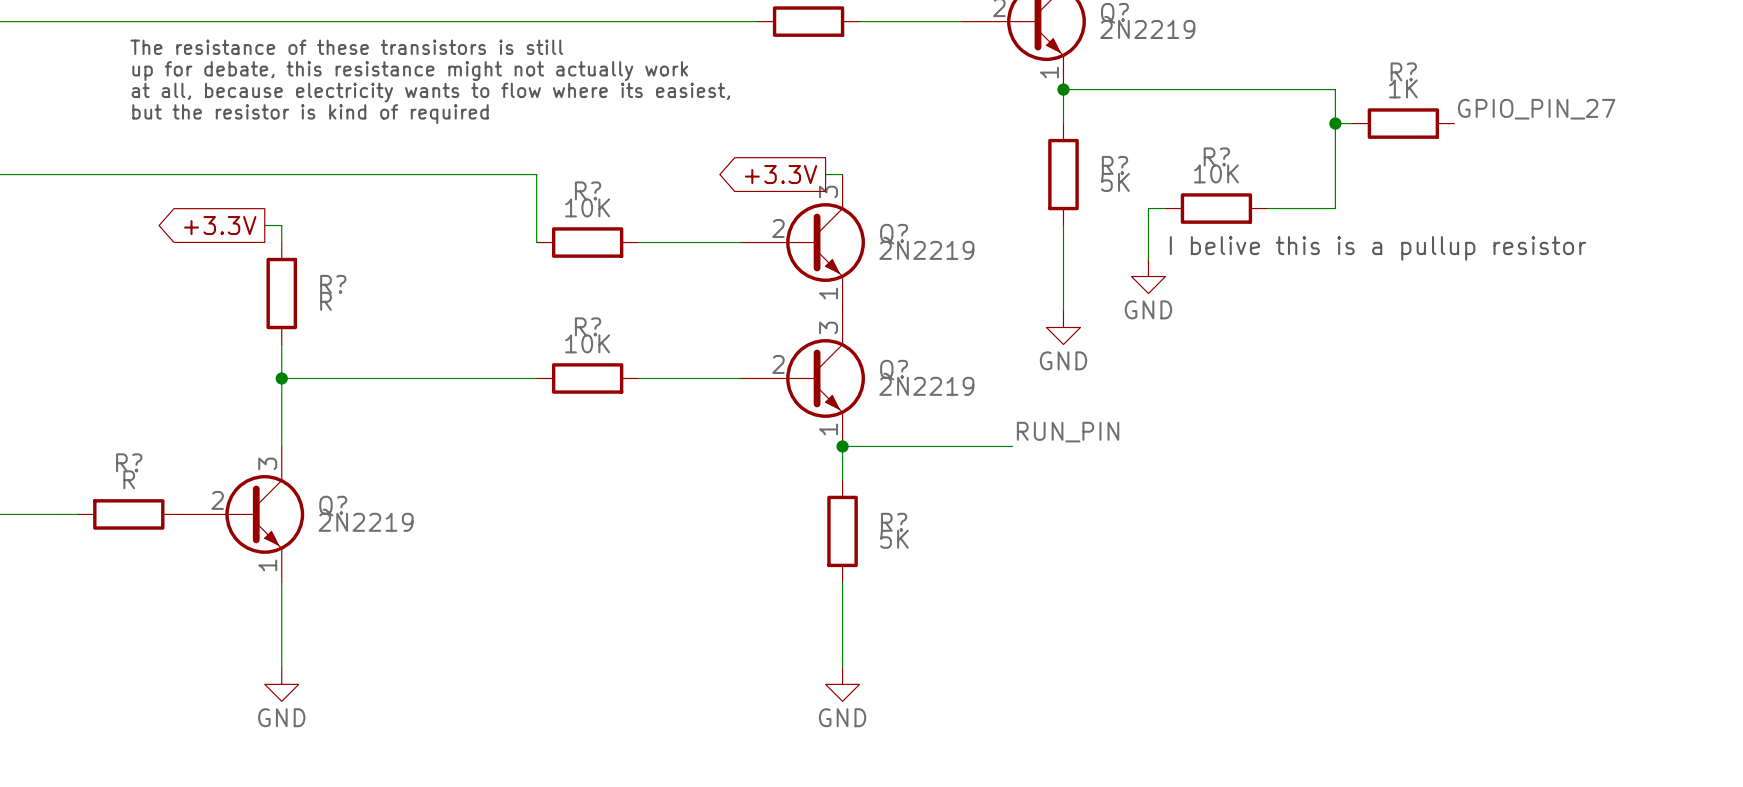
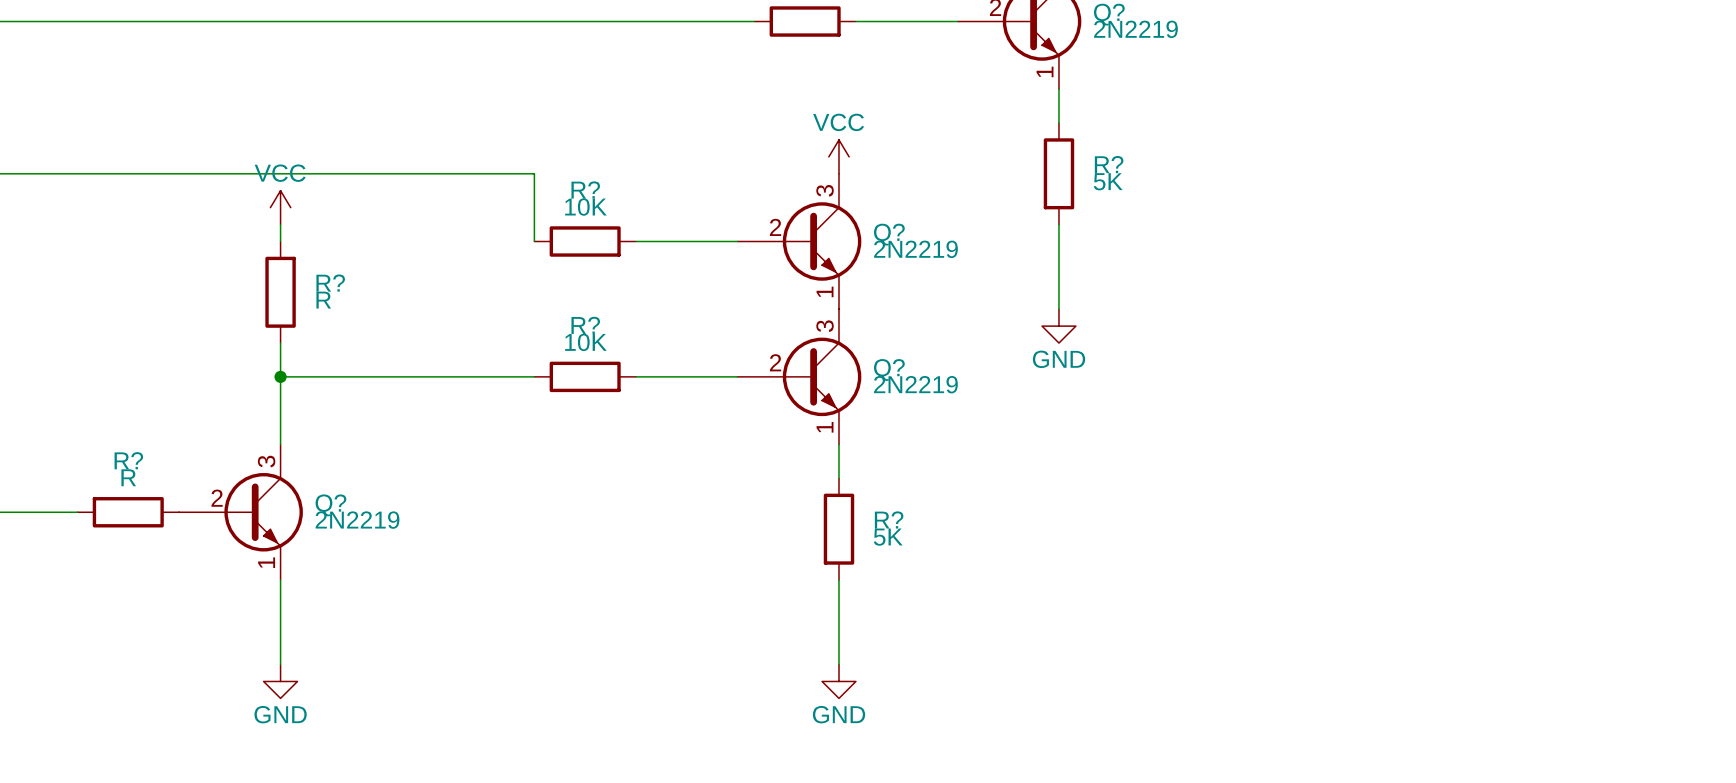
text: The resistance of these transistors is still (346, 47) -> none
text: up for debate, this resistance might not actually work (410, 71) -> none
wire: (1063, 89) (1335, 89) (1335, 208) (1267, 208) -> none
junction: (1063, 89) -> none
text: at all, because electricity wants to flow where its easiest, (430, 92) -> none
label: GPIO_PIN_27 (1536, 109) -> none
text: but the resistor is kind of required (310, 114) -> none
wire: (1335, 123) (1352, 123) -> none
junction: (1335, 123) -> none
R?: 1K (1403, 123) -> none
power symbol: none -> VCC (838, 156)
global label: +3.3V (781, 174) -> none
wire: (825, 174) (842, 174) -> none
power symbol: none -> VCC (280, 207)
wire: (1165, 208) (1148, 208) (1148, 259) -> none
R?: 10K (1216, 208) -> none
global label: +3.3V (220, 225) -> none
wire: (264, 225) (281, 225) -> none
text: I belive this is a pullup resistor (1378, 248) -> none
power symbol: GND (1148, 276) -> none
label: RUN_PIN (1068, 432) -> none
wire: (842, 446) (1012, 446) -> none
junction: (842, 446) -> none

